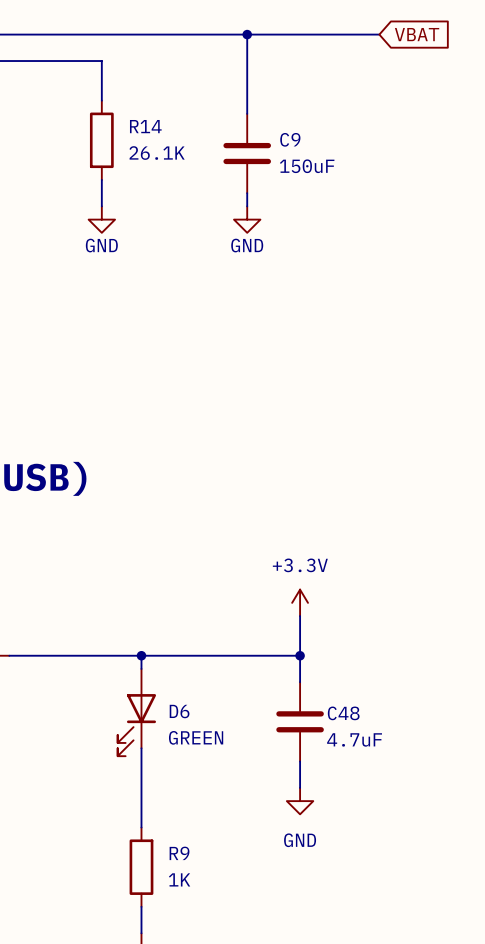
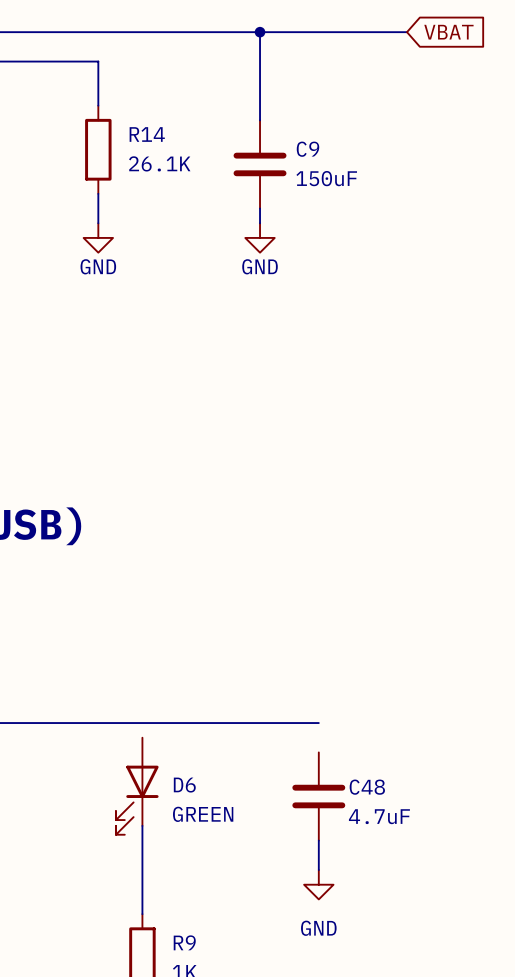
power symbol: +3.3V (300, 602) -> none
wire: (300, 616) (300, 682) -> none
wire: (141, 655) (141, 668) -> none
junction: (141, 655) -> none
junction: (300, 655) -> none

